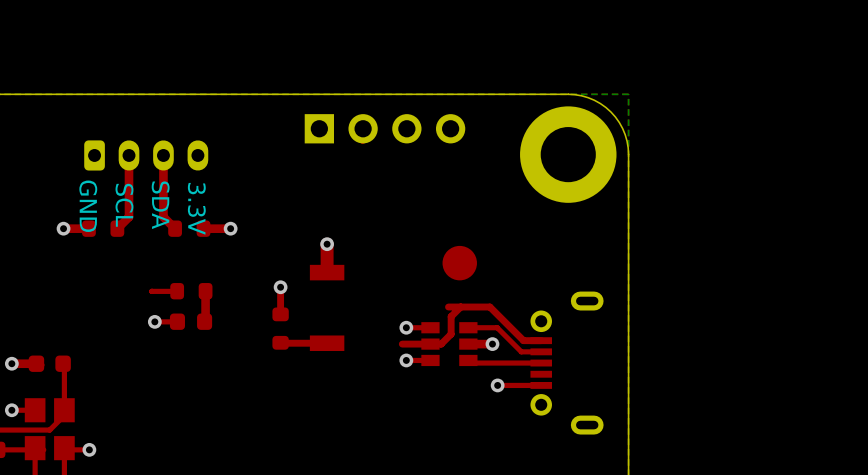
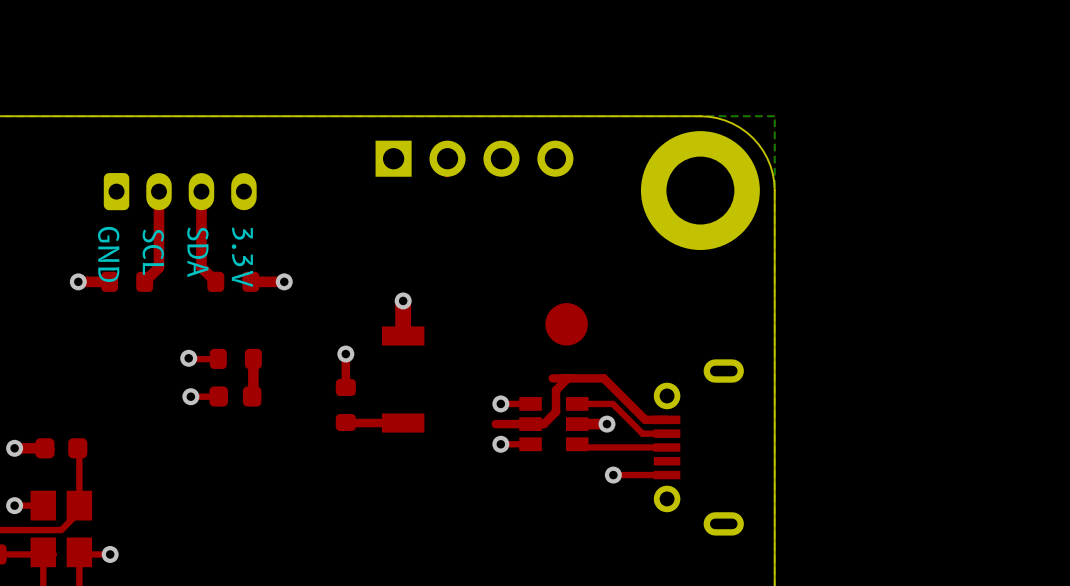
via: none -> (188, 358)

